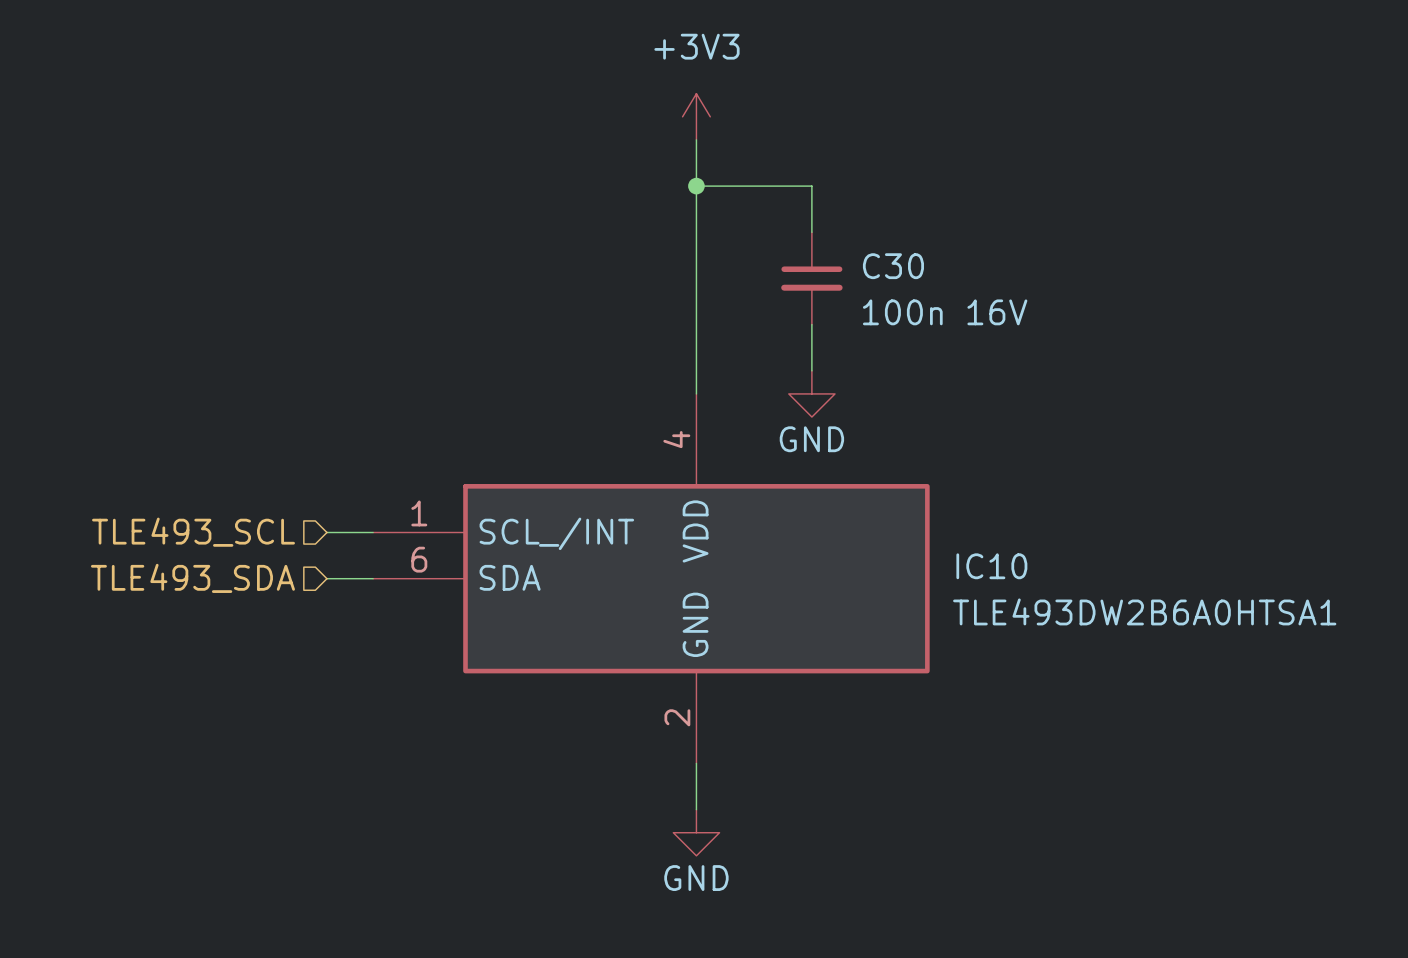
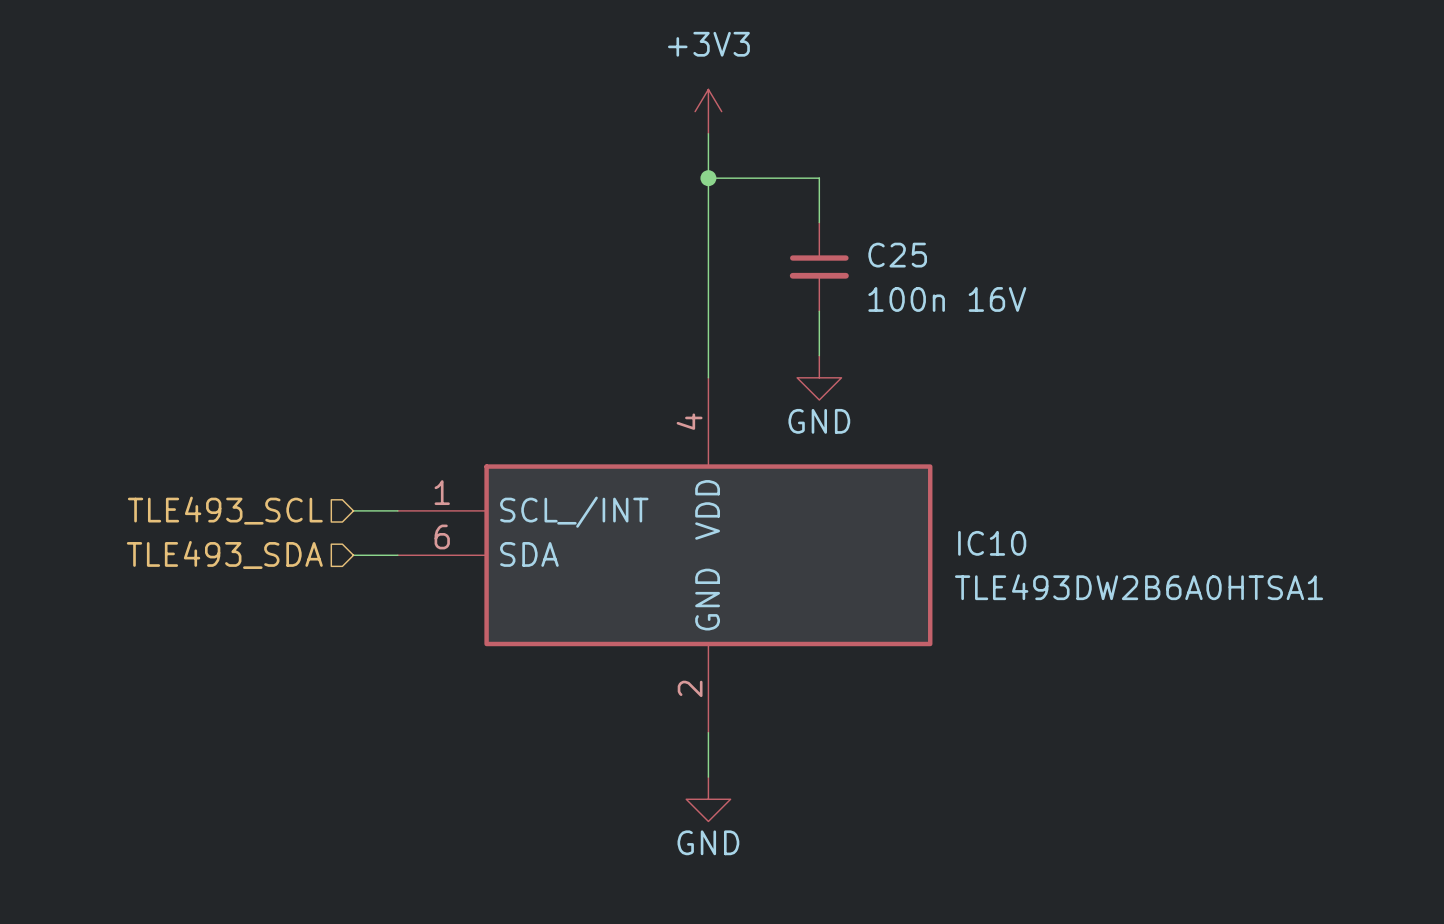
C30 name: C30 (893, 266) -> C25 (897, 255)

